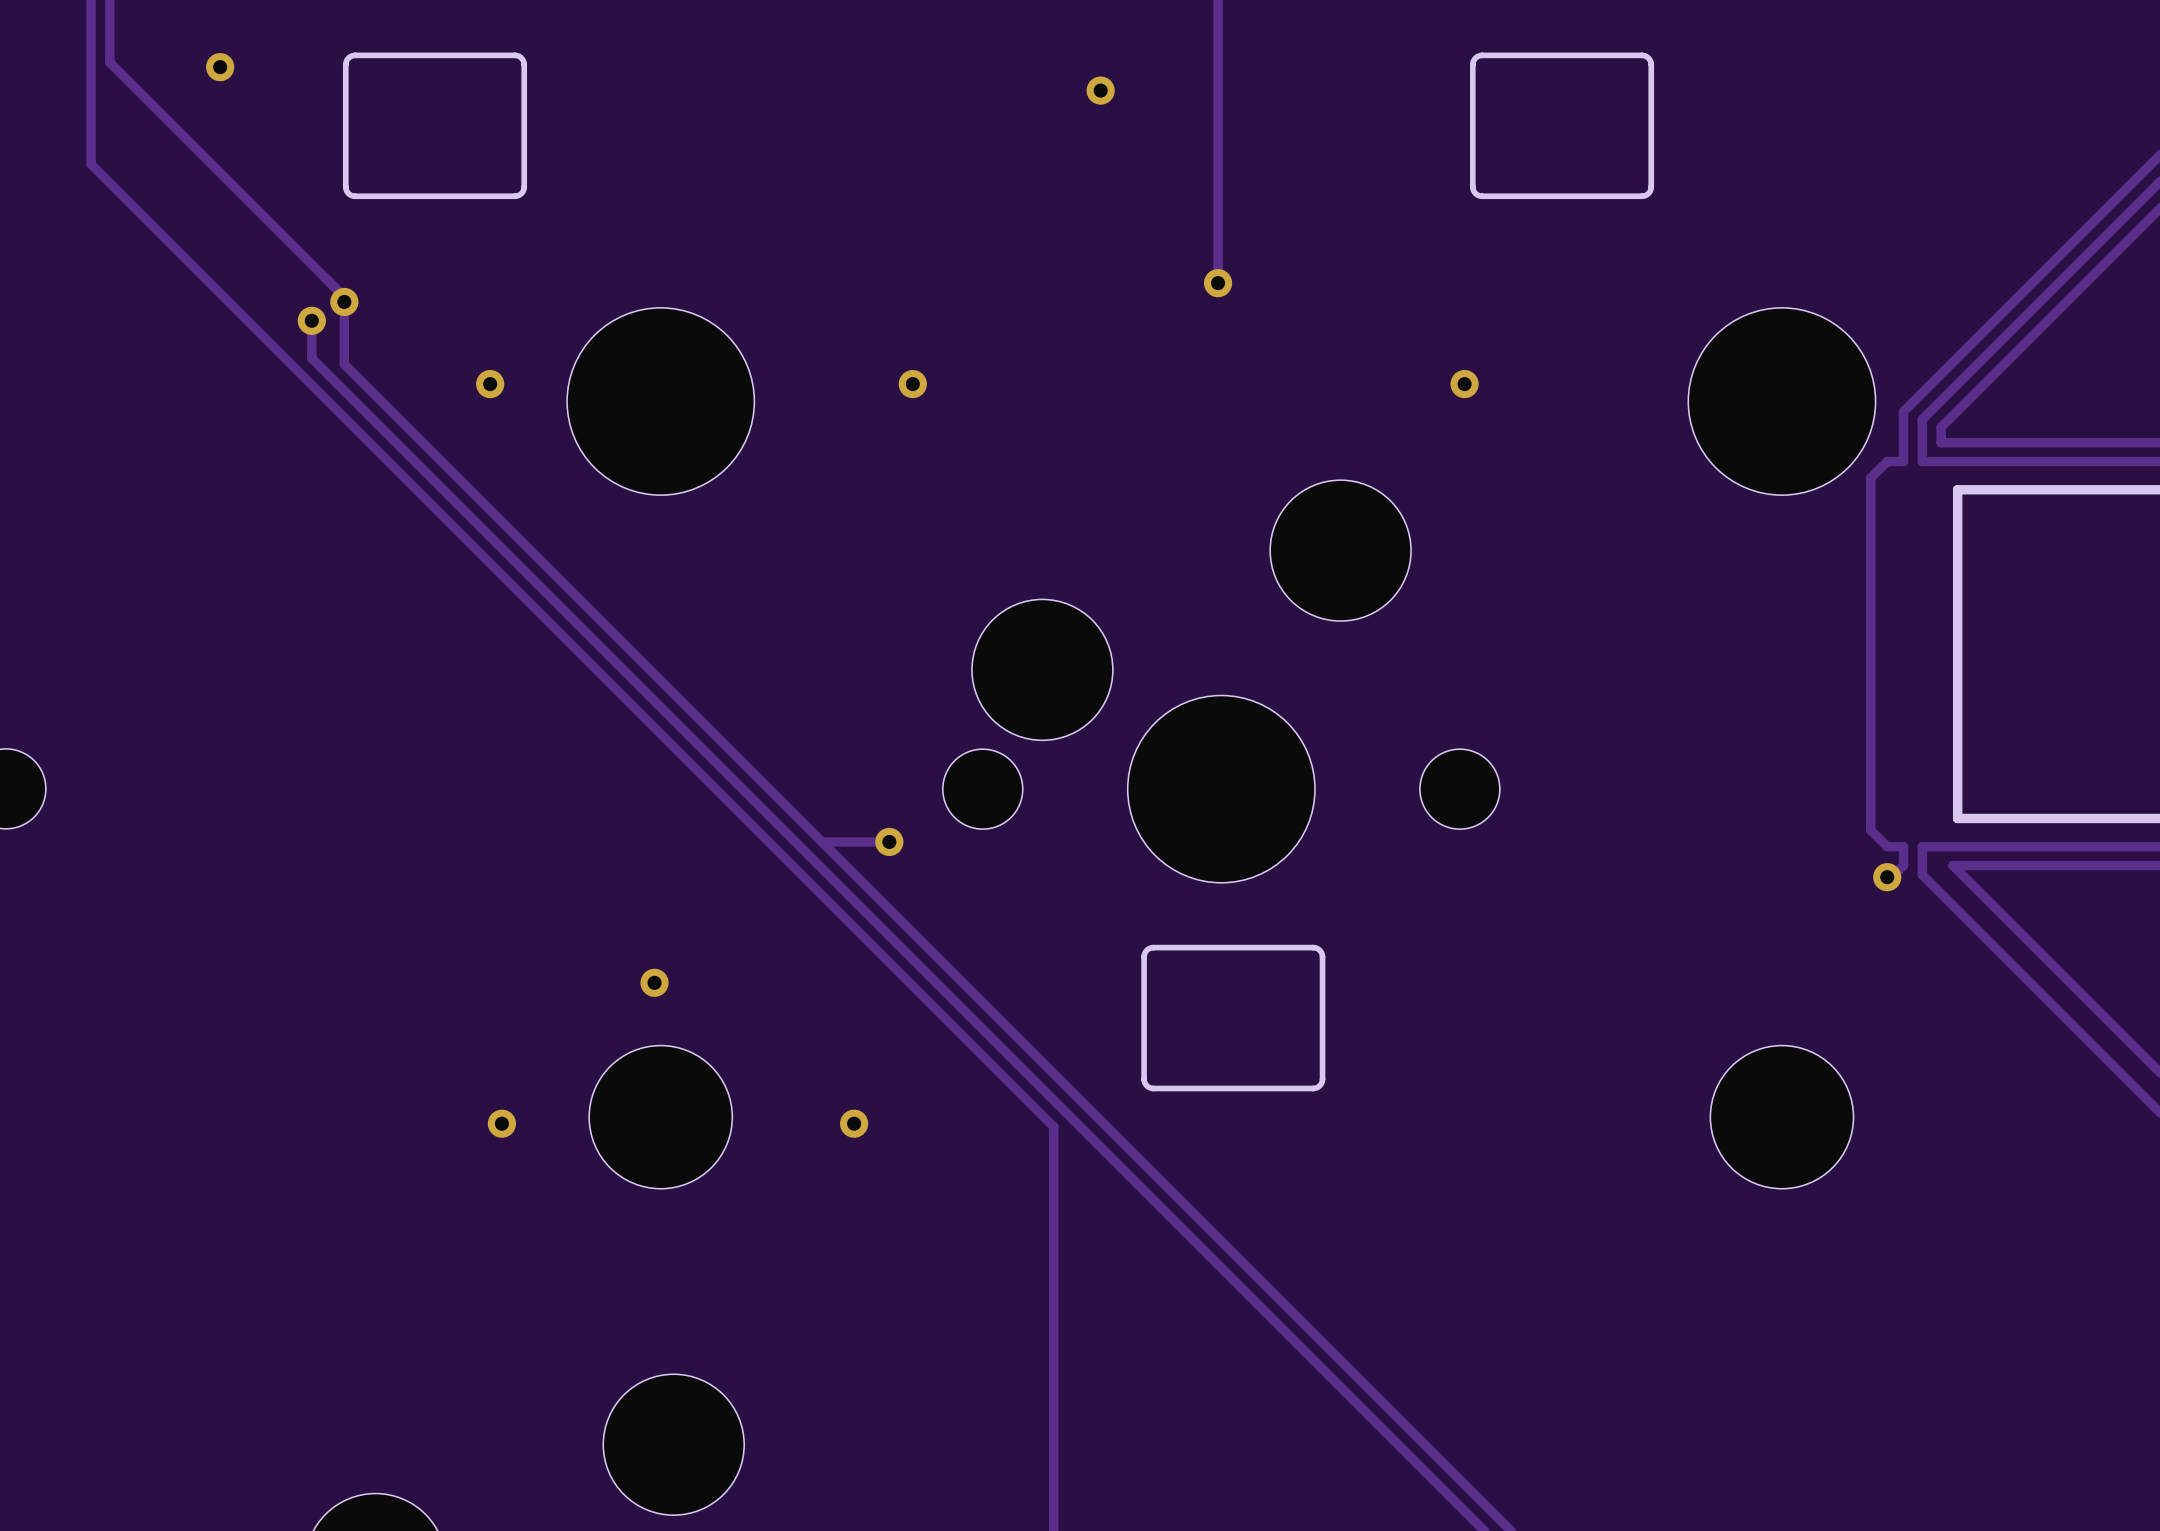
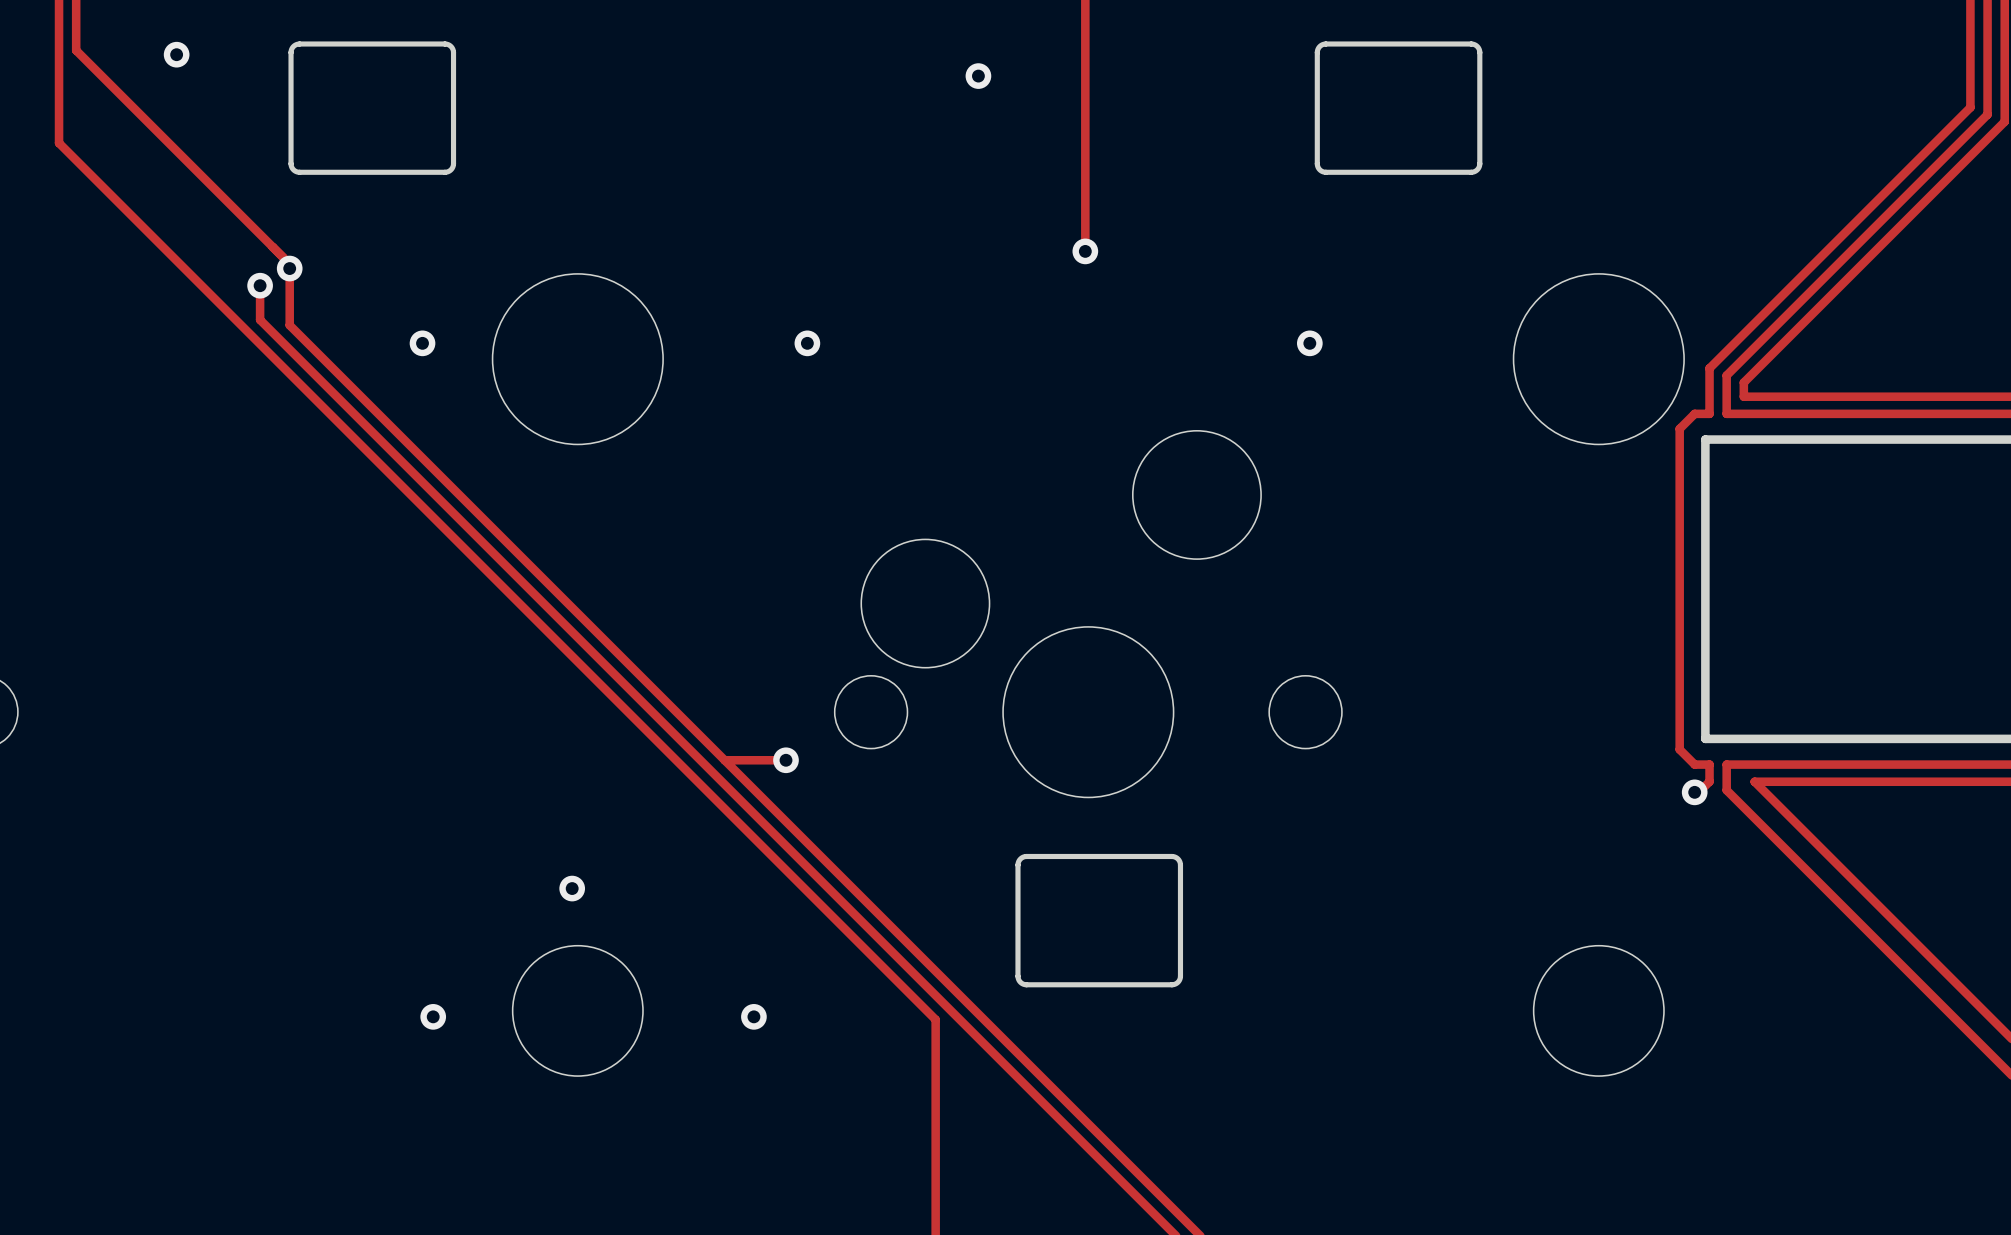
board edge: (1957, 489) (1957, 818) -> (1758, 439) (1705, 439) (1705, 738) (1758, 738)

